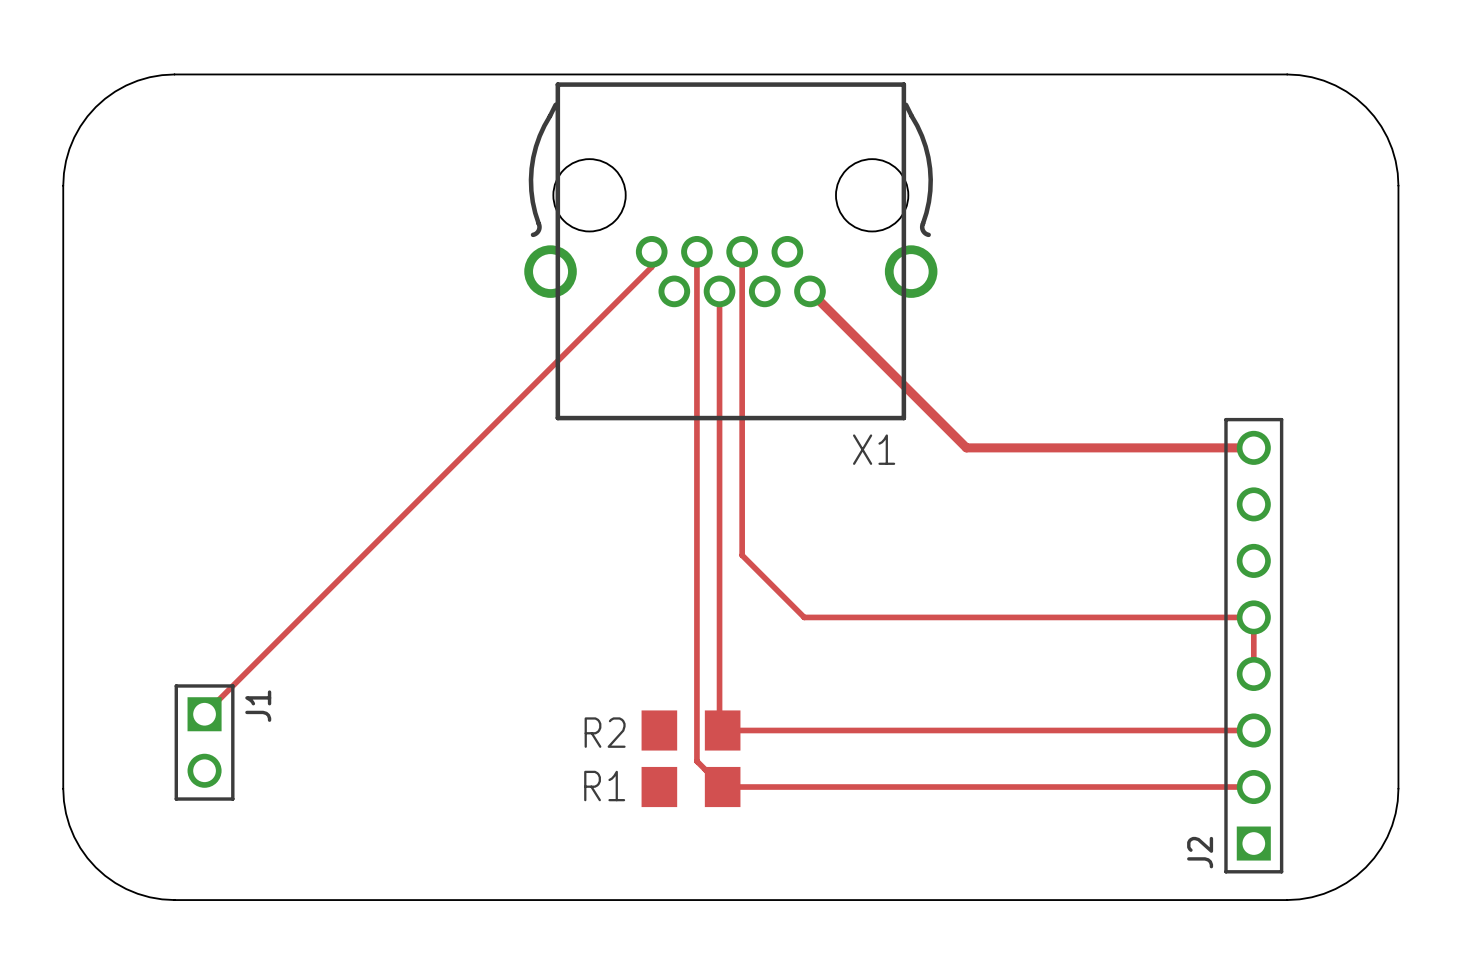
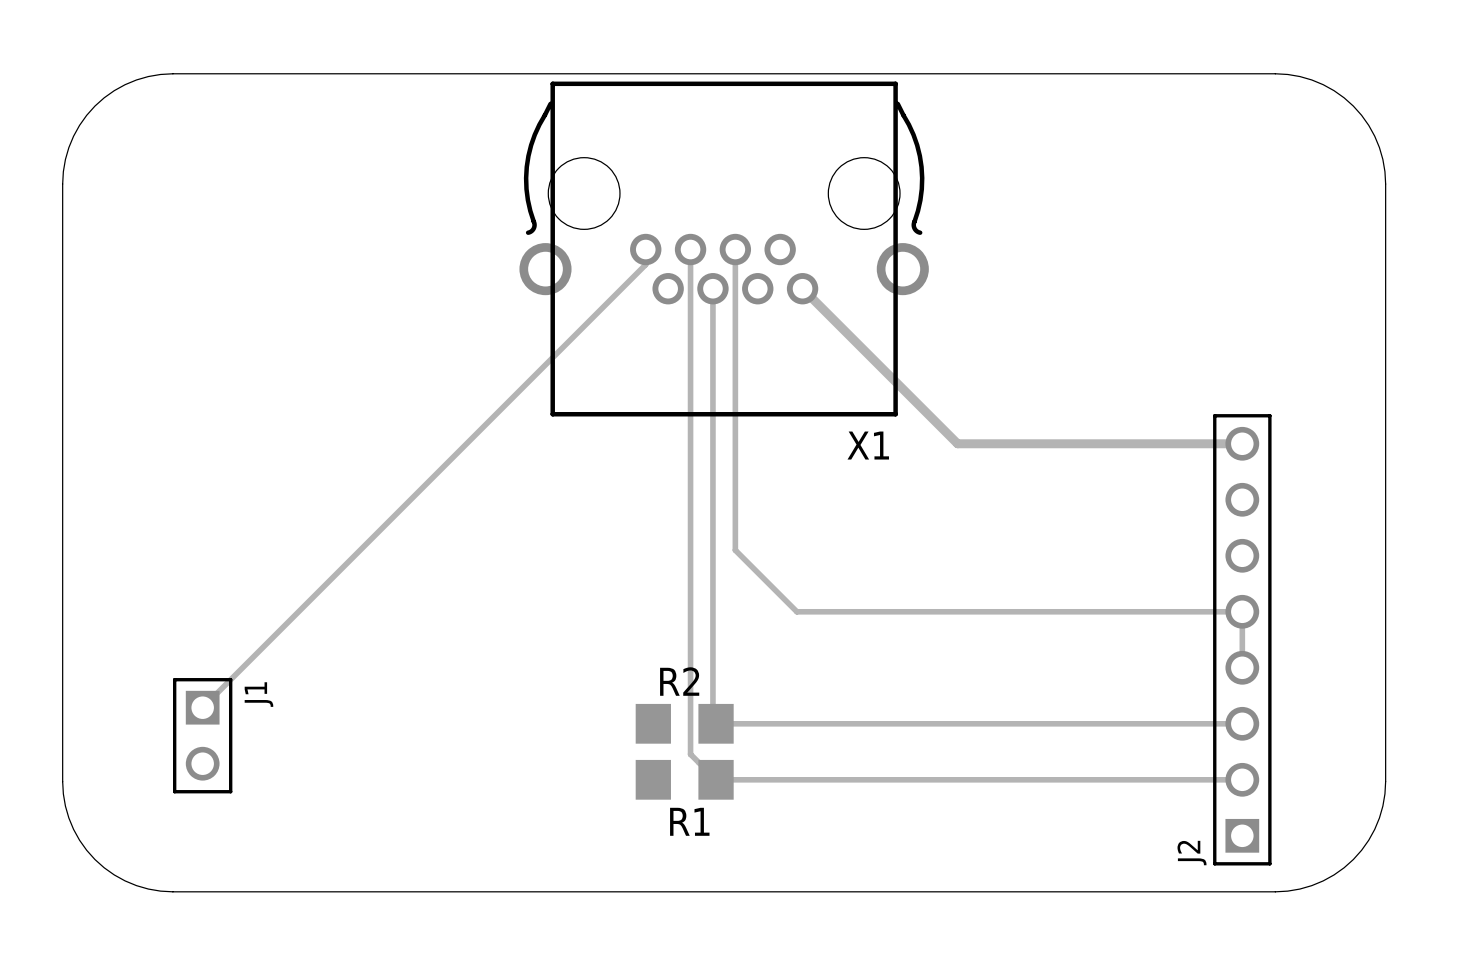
R2 name position: R2 (605, 732) -> R2 (679, 681)
R1 name position: R1 (604, 786) -> R1 (689, 821)

